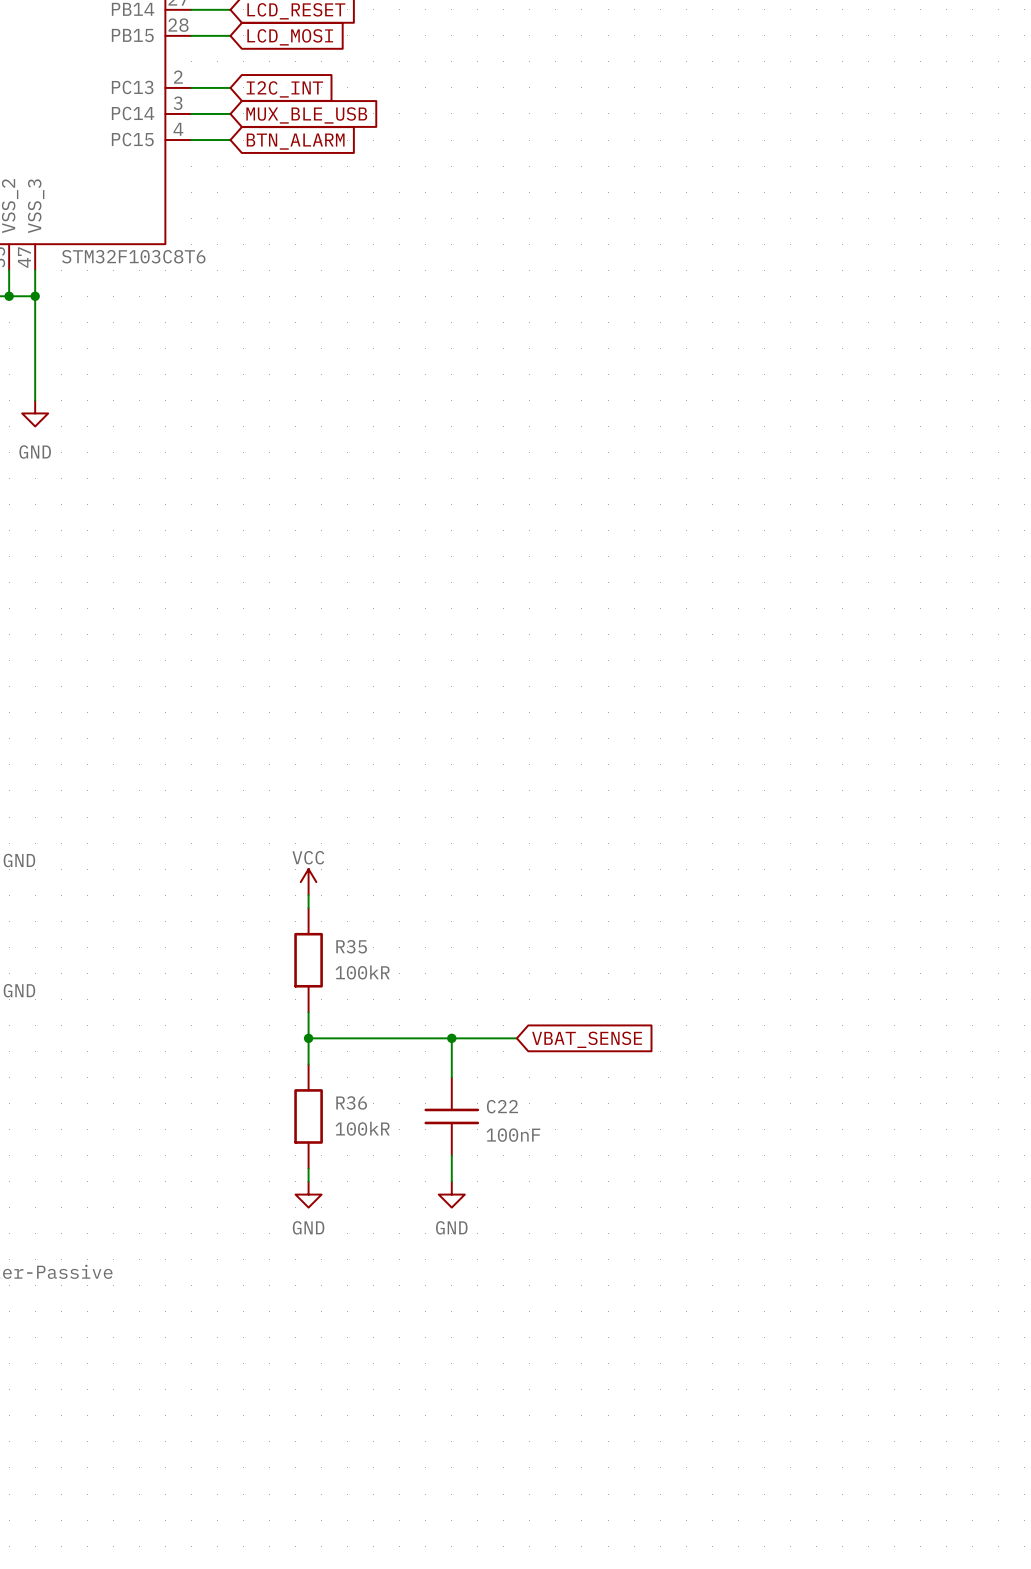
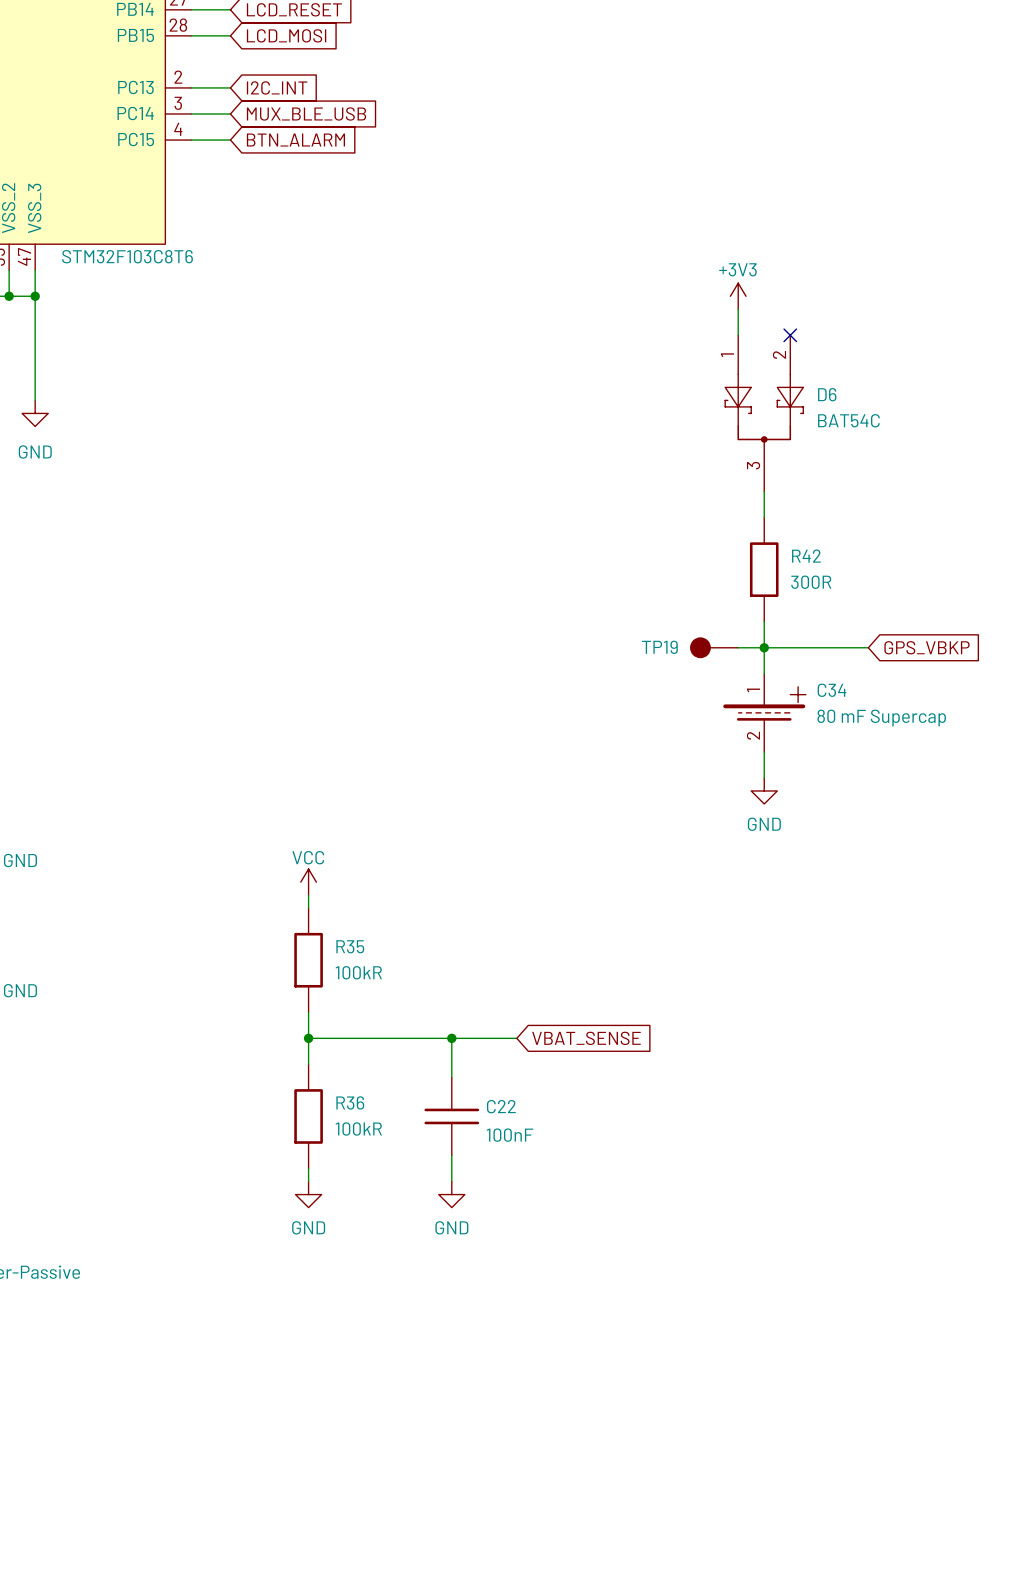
power symbol: none -> +3V3 (738, 296)
wire: none -> (738, 309) (738, 335)
no-connect mark: none -> (790, 335)
D6: none -> BAT54C (764, 413)
wire: none -> (764, 491) (764, 517)
R42: none -> 300R (764, 569)
wire: none -> (764, 621) (764, 673)
TP19: none -> (714, 647)
wire: none -> (738, 647) (868, 647)
junction: none -> (764, 647)
global label: none -> GPS_VBKP (927, 647)
C34: none -> 80 mF Supercap (764, 712)
wire: none -> (764, 751) (764, 777)
power symbol: none -> GND (764, 790)

